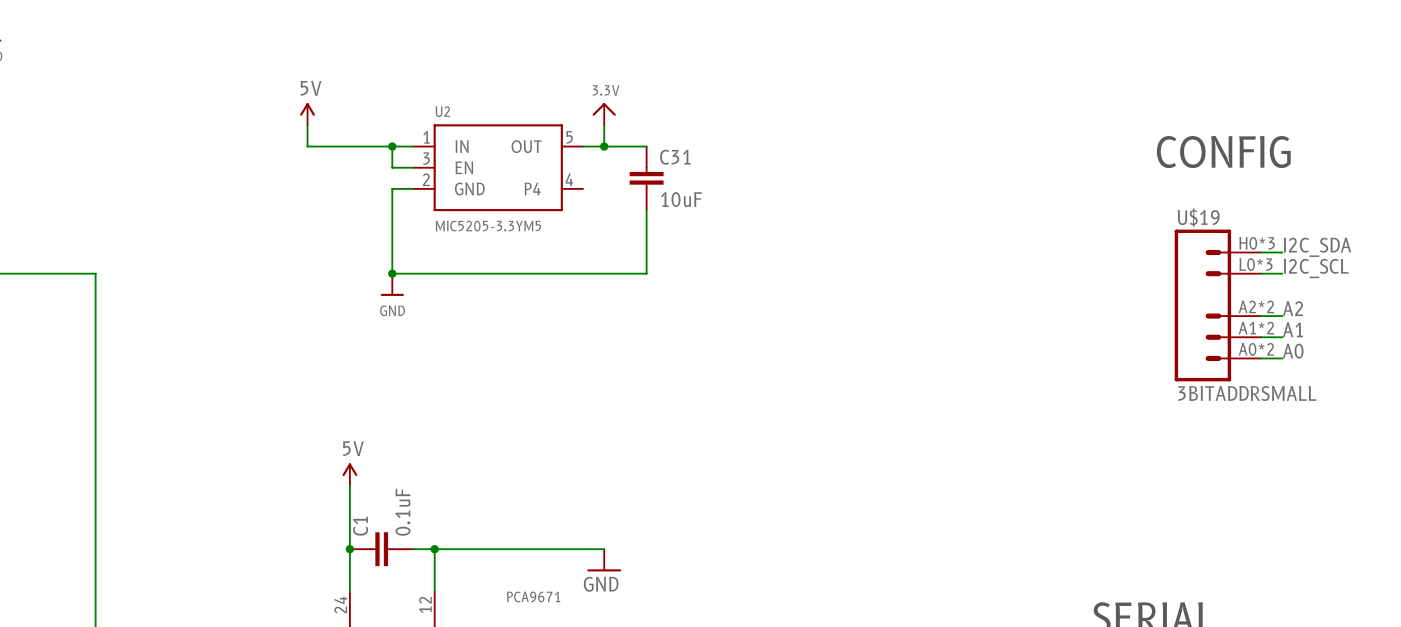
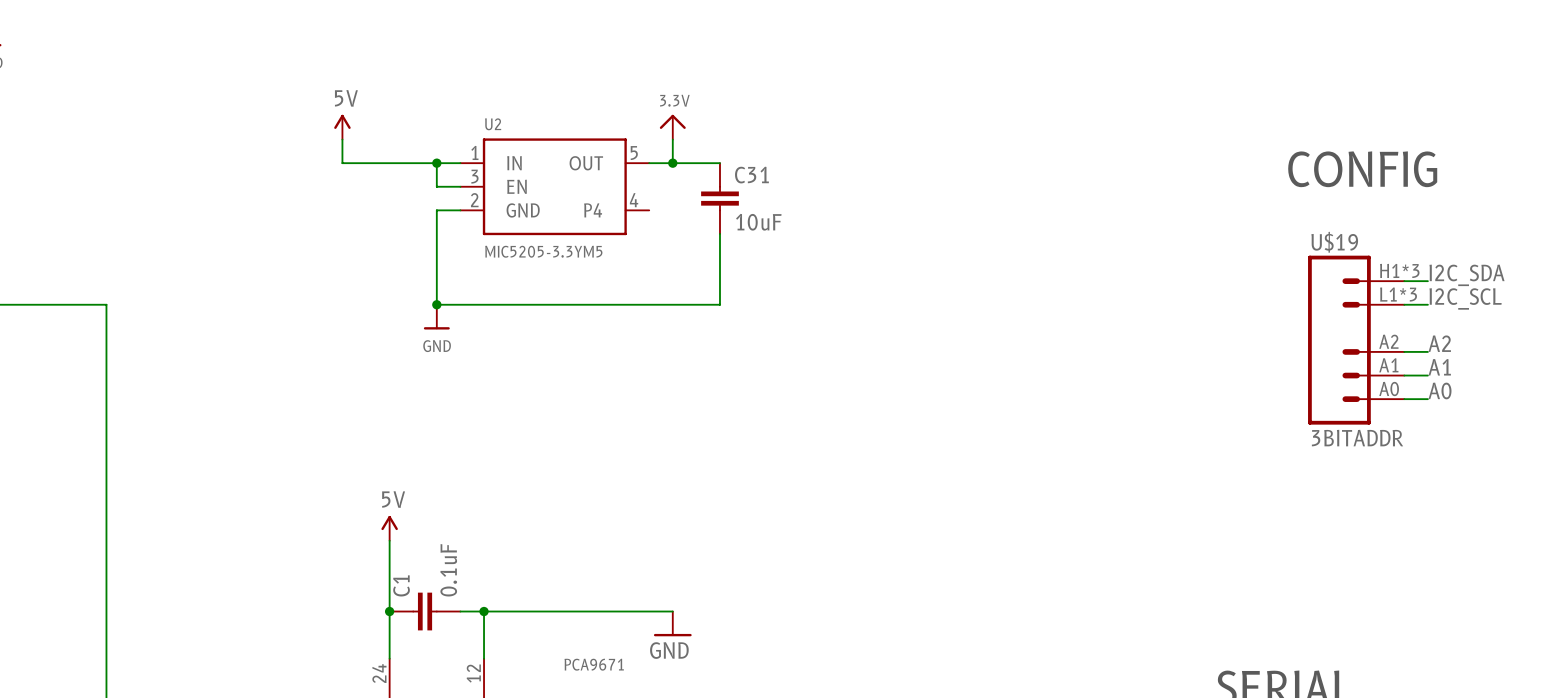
U$19 pin number: H0*3 (1257, 243) -> H1*3 (1399, 270)
U$19 pin number: L0*3 (1255, 264) -> L1*3 (1398, 294)
U$19 pin number: A2*2 (1256, 306) -> A2 (1388, 341)
U$19 pin number: A1*2 (1256, 328) -> A1 (1388, 365)
U$19 pin number: A0*2 (1256, 349) -> A0 (1389, 389)
U$19 value: 3BITADDRSMALL (1247, 393) -> 3BITADDR (1357, 438)

